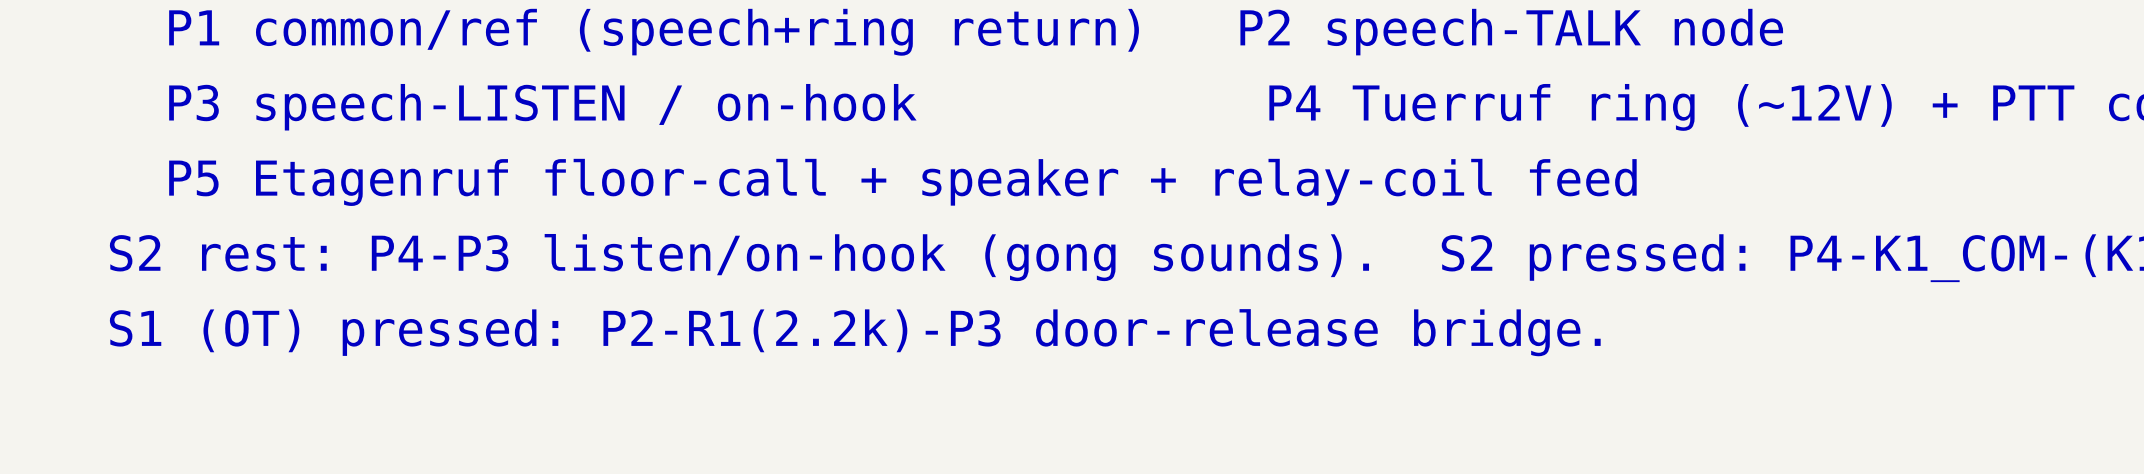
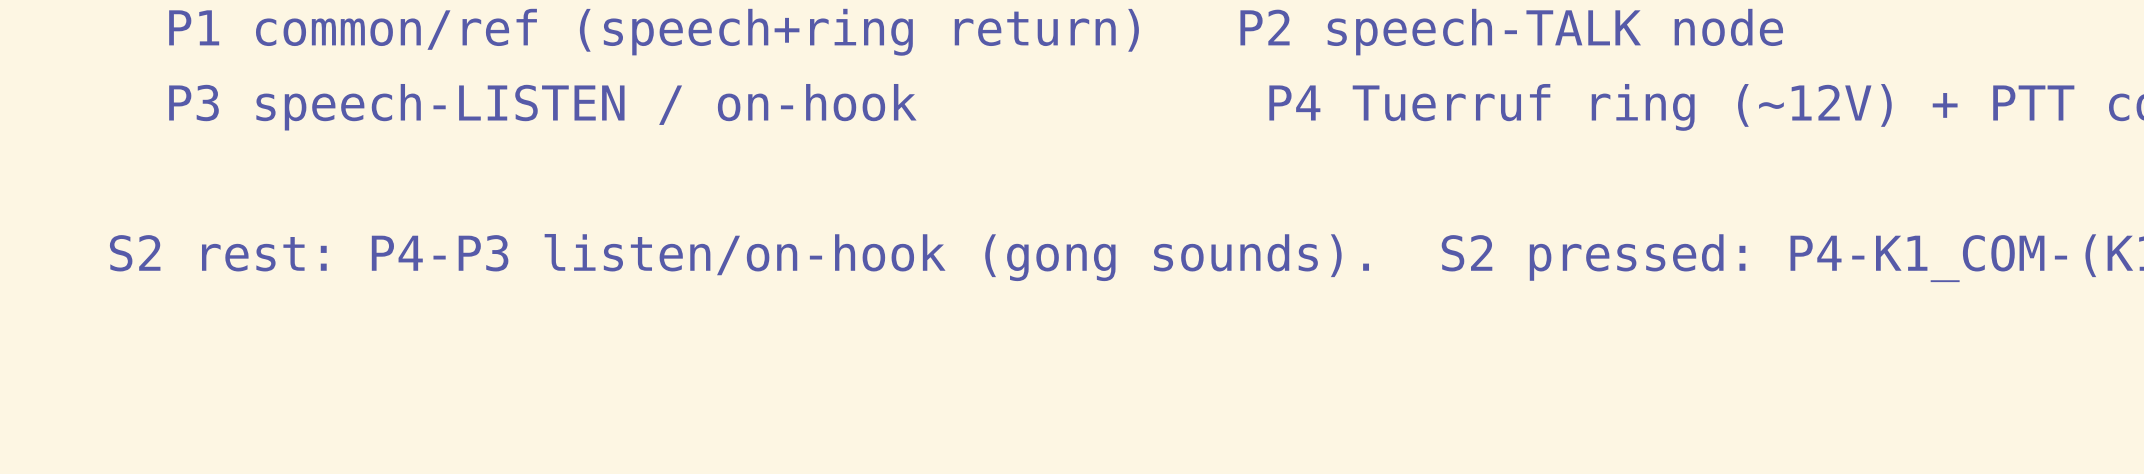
text: P5 Etagenruf floor-call + speaker + relay-coil feed (902, 182) -> none
text: S1 (OT) pressed: P2-R1(2.2k)-P3 door-release bridge. (855, 332) -> none

